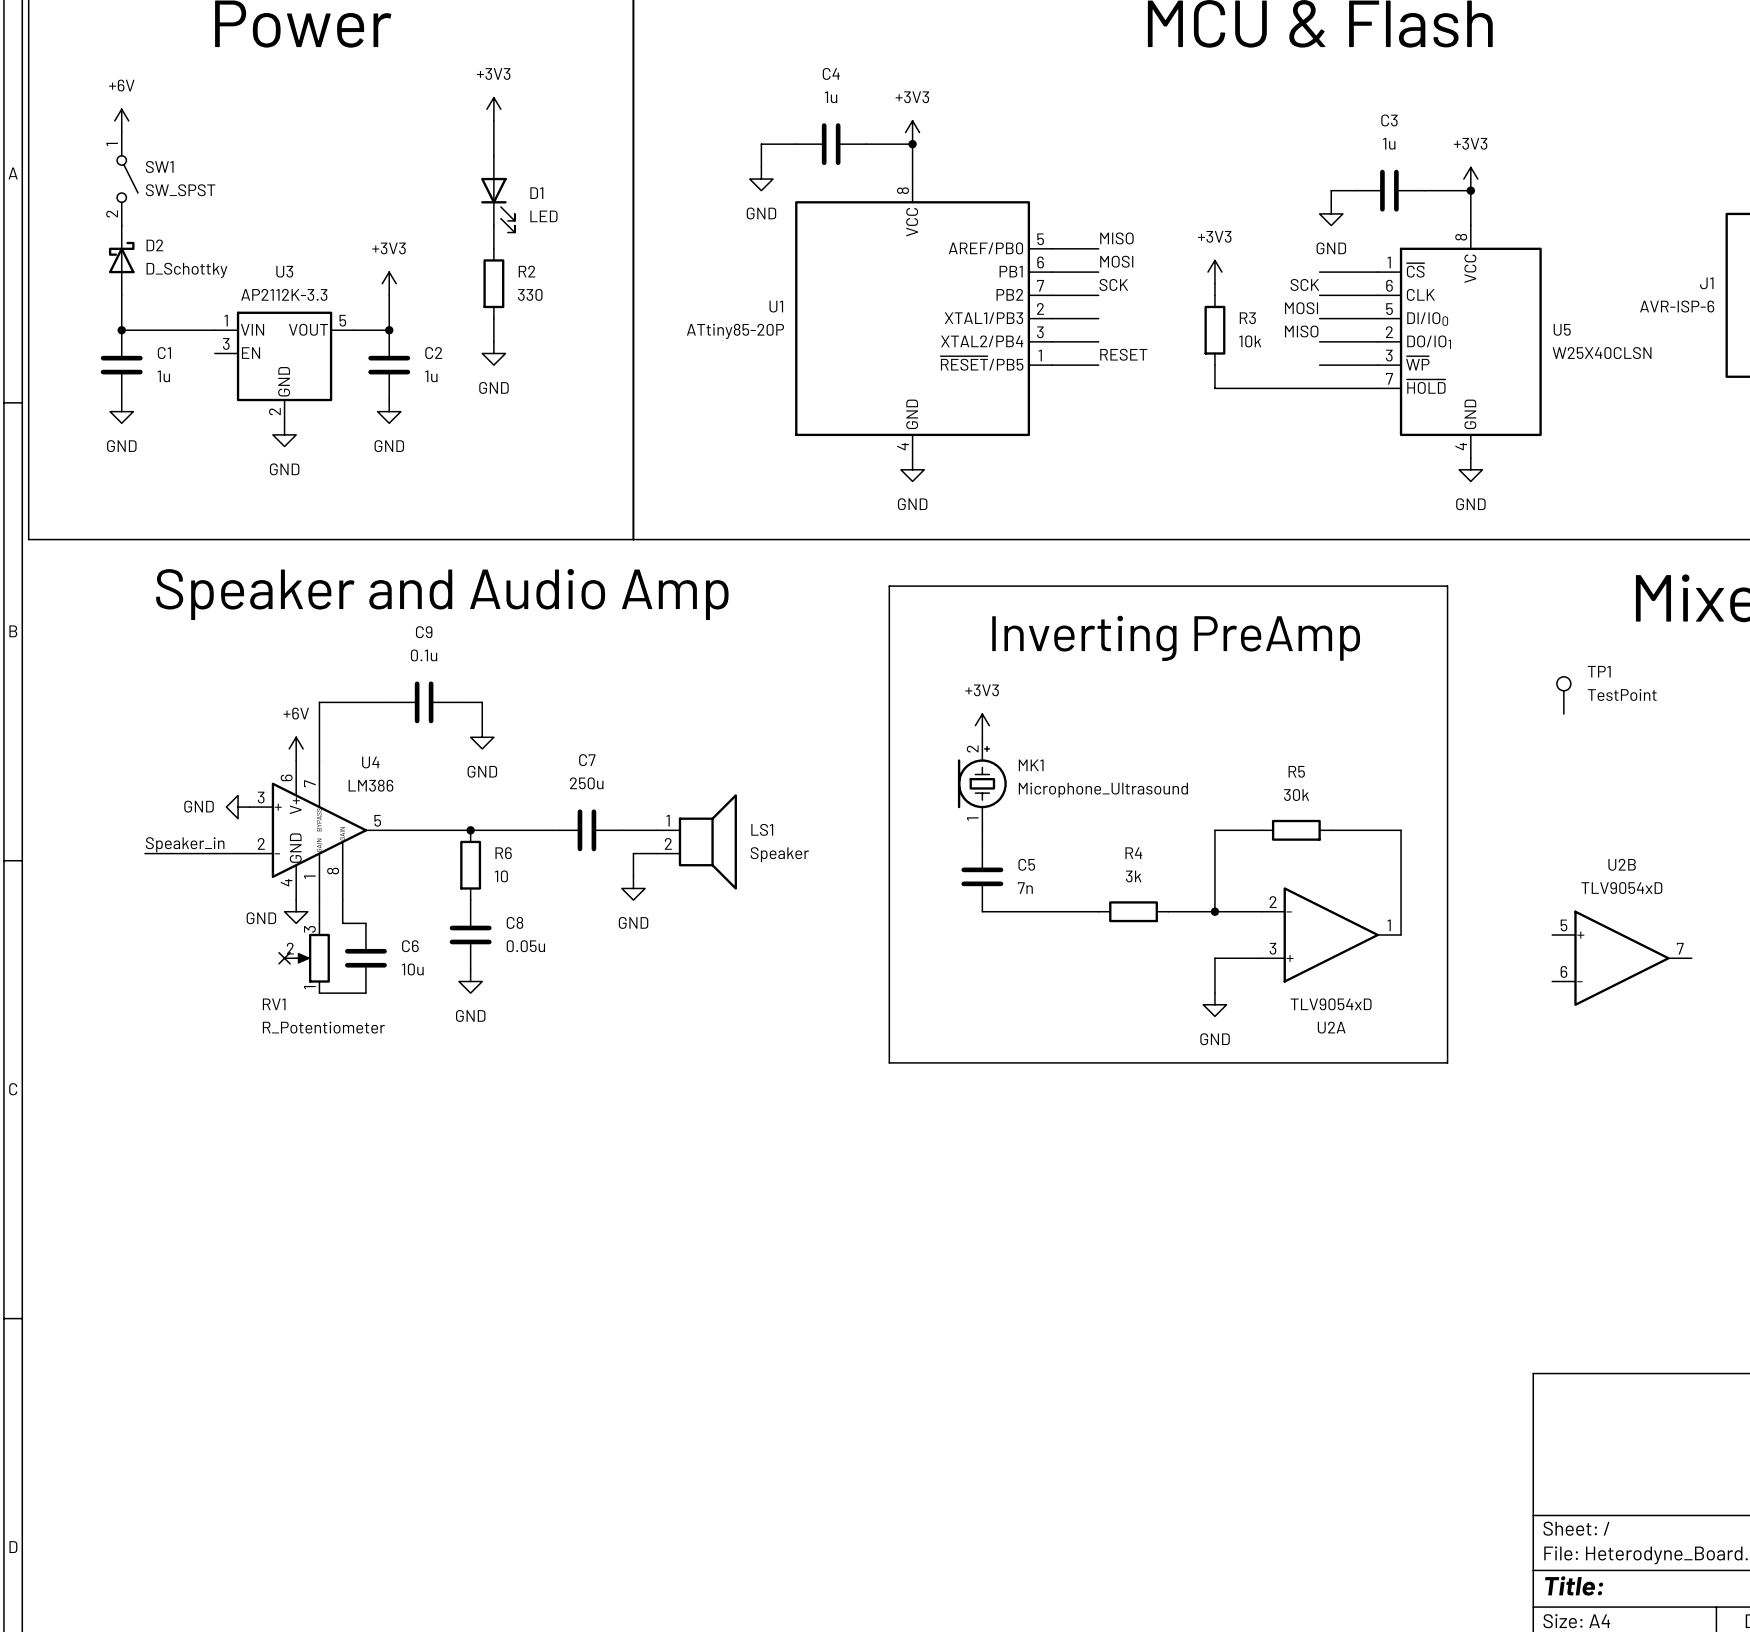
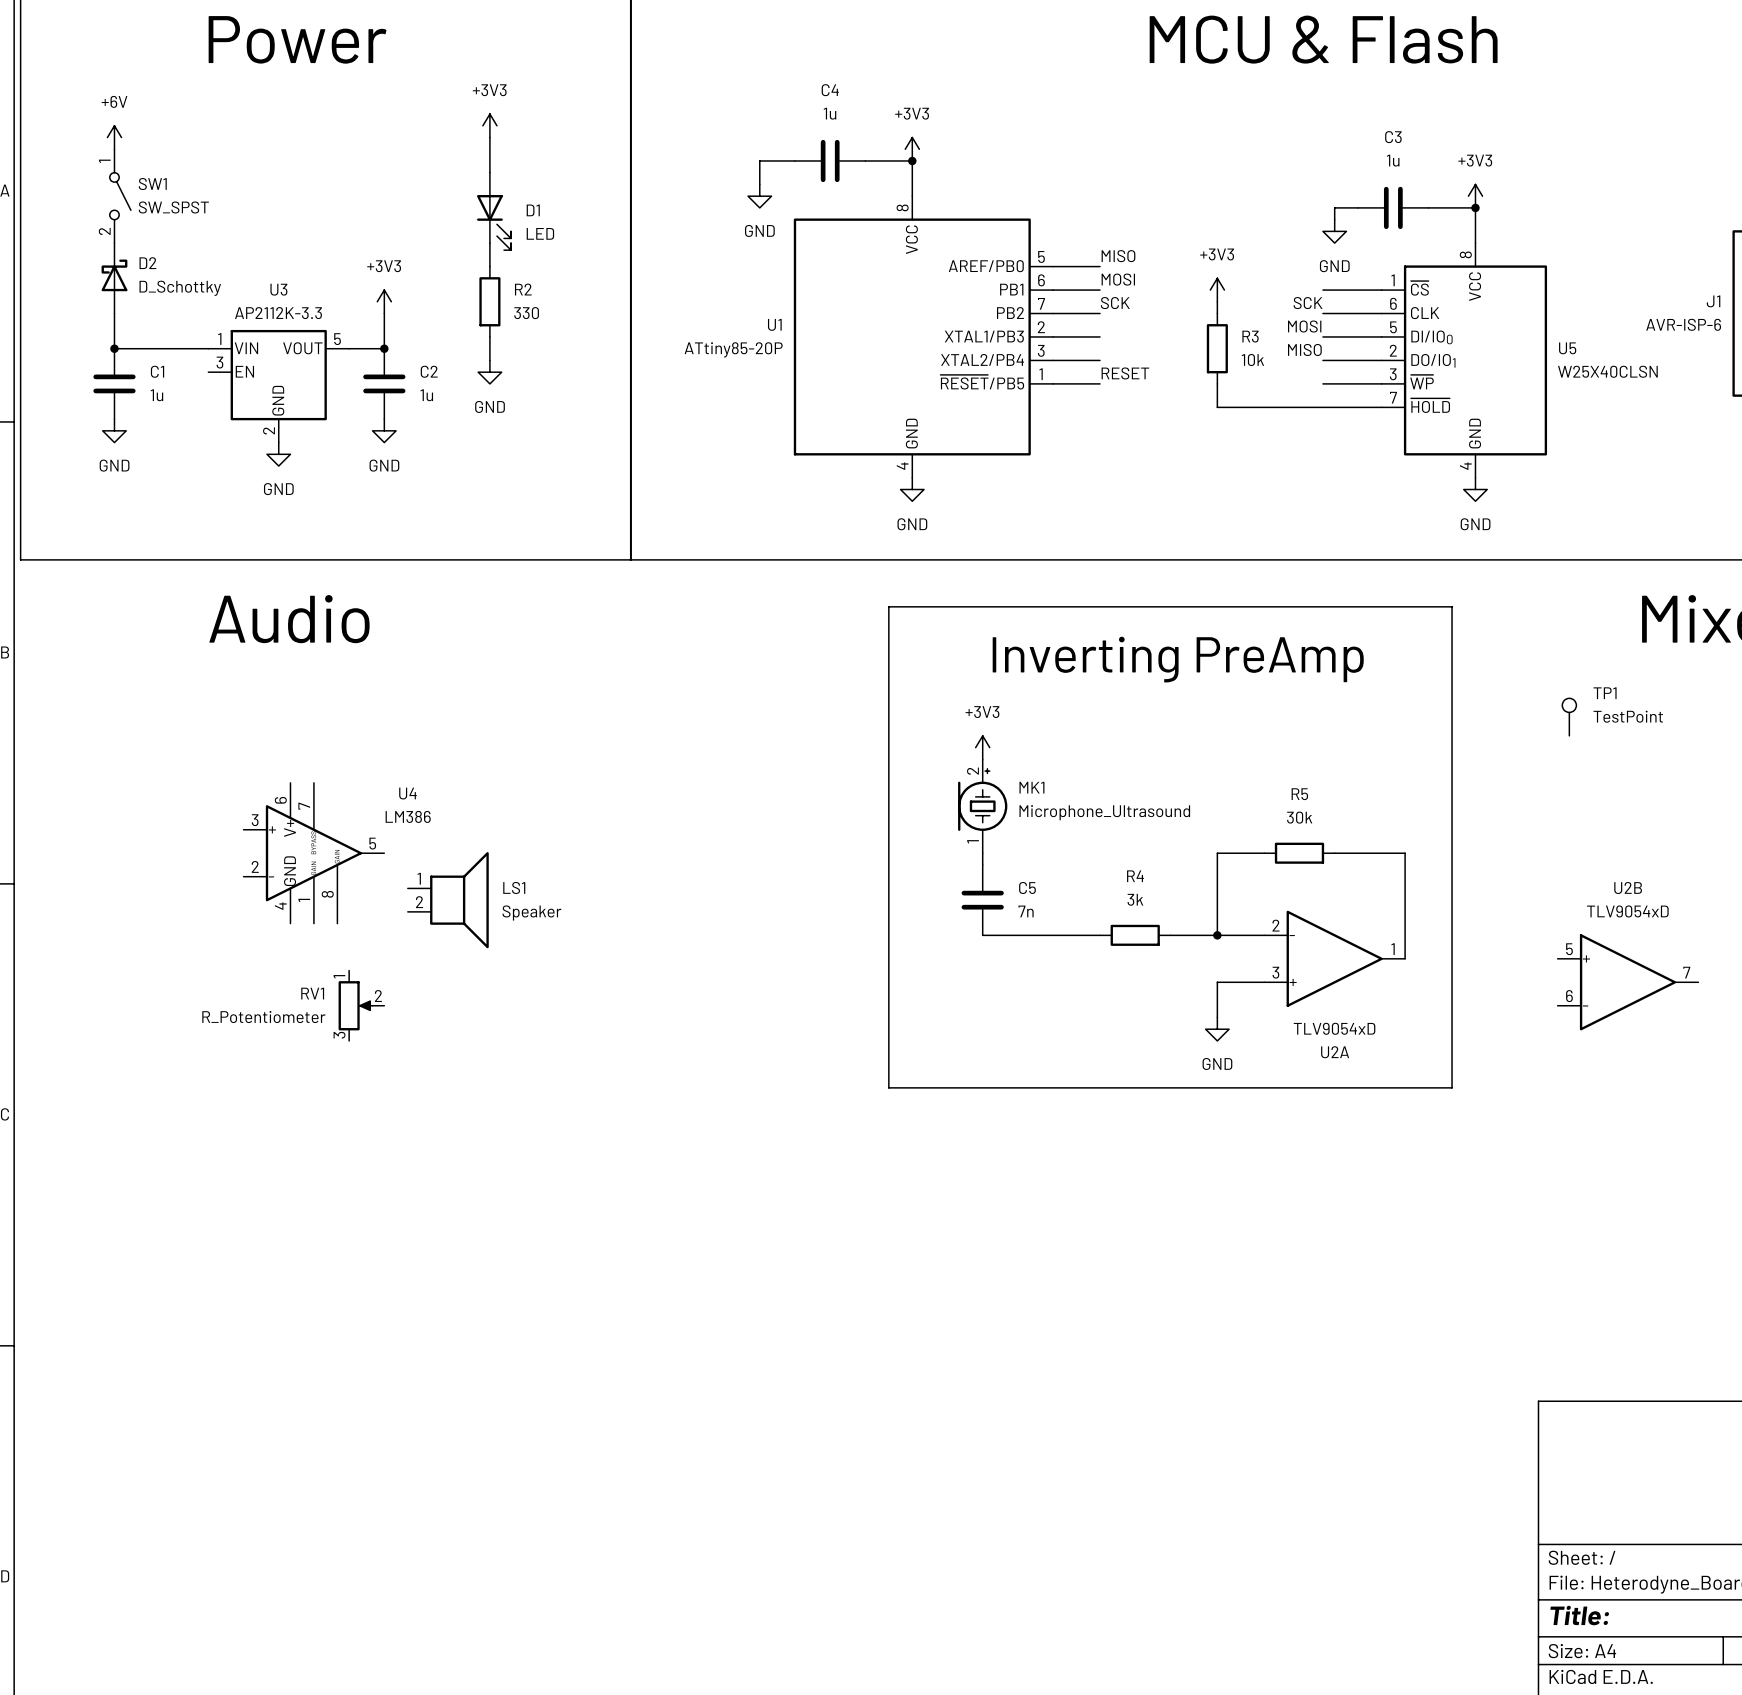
text: Speaker and Audio Amp (442, 594) -> none
text: none -> Audio (289, 619)
wire: (389, 702) (319, 702) (319, 760) -> none
C9: 0.1u (424, 702) -> none
wire: (459, 702) (482, 702) (482, 725) -> none
power symbol: GND (482, 737) -> none
power symbol: +6V (296, 748) -> none
U4 name position: U4 (370, 762) -> U4 (408, 793)
U4 value position: LM386 (370, 785) -> LM386 (408, 816)
power symbol: GND (238, 807) -> none
wire: (389, 830) (552, 830) -> none
junction: (470, 830) -> none
C7: 250u (586, 830) -> none
wire: (621, 830) (656, 830) -> none
LS1 position: (696, 841) -> (448, 900)
label: Speaker_in (185, 844) -> none
wire: (144, 853) (249, 853) -> none
wire: (656, 853) (633, 853) (633, 876) -> none
R6: 10 (470, 865) -> none
power symbol: GND (633, 888) -> none
wire: (319, 900) (319, 923) -> none
wire: (342, 900) (342, 923) (365, 923) -> none
power symbol: GND (296, 911) -> none
C8: 0.05u (470, 934) -> none
no-connect mark: (284, 958) -> none
RV1 position: (307, 958) -> (361, 1005)
RV1 rotation: 0° (313, 958) -> 180° (355, 1005)
C6: 10u (365, 958) -> none
power symbol: GND (470, 981) -> none
wire: (319, 993) (365, 993) -> none
RV1 name position: RV1 (274, 1004) -> RV1 (312, 993)
RV1 value position: R_Potentiometer (323, 1027) -> R_Potentiometer (263, 1017)

